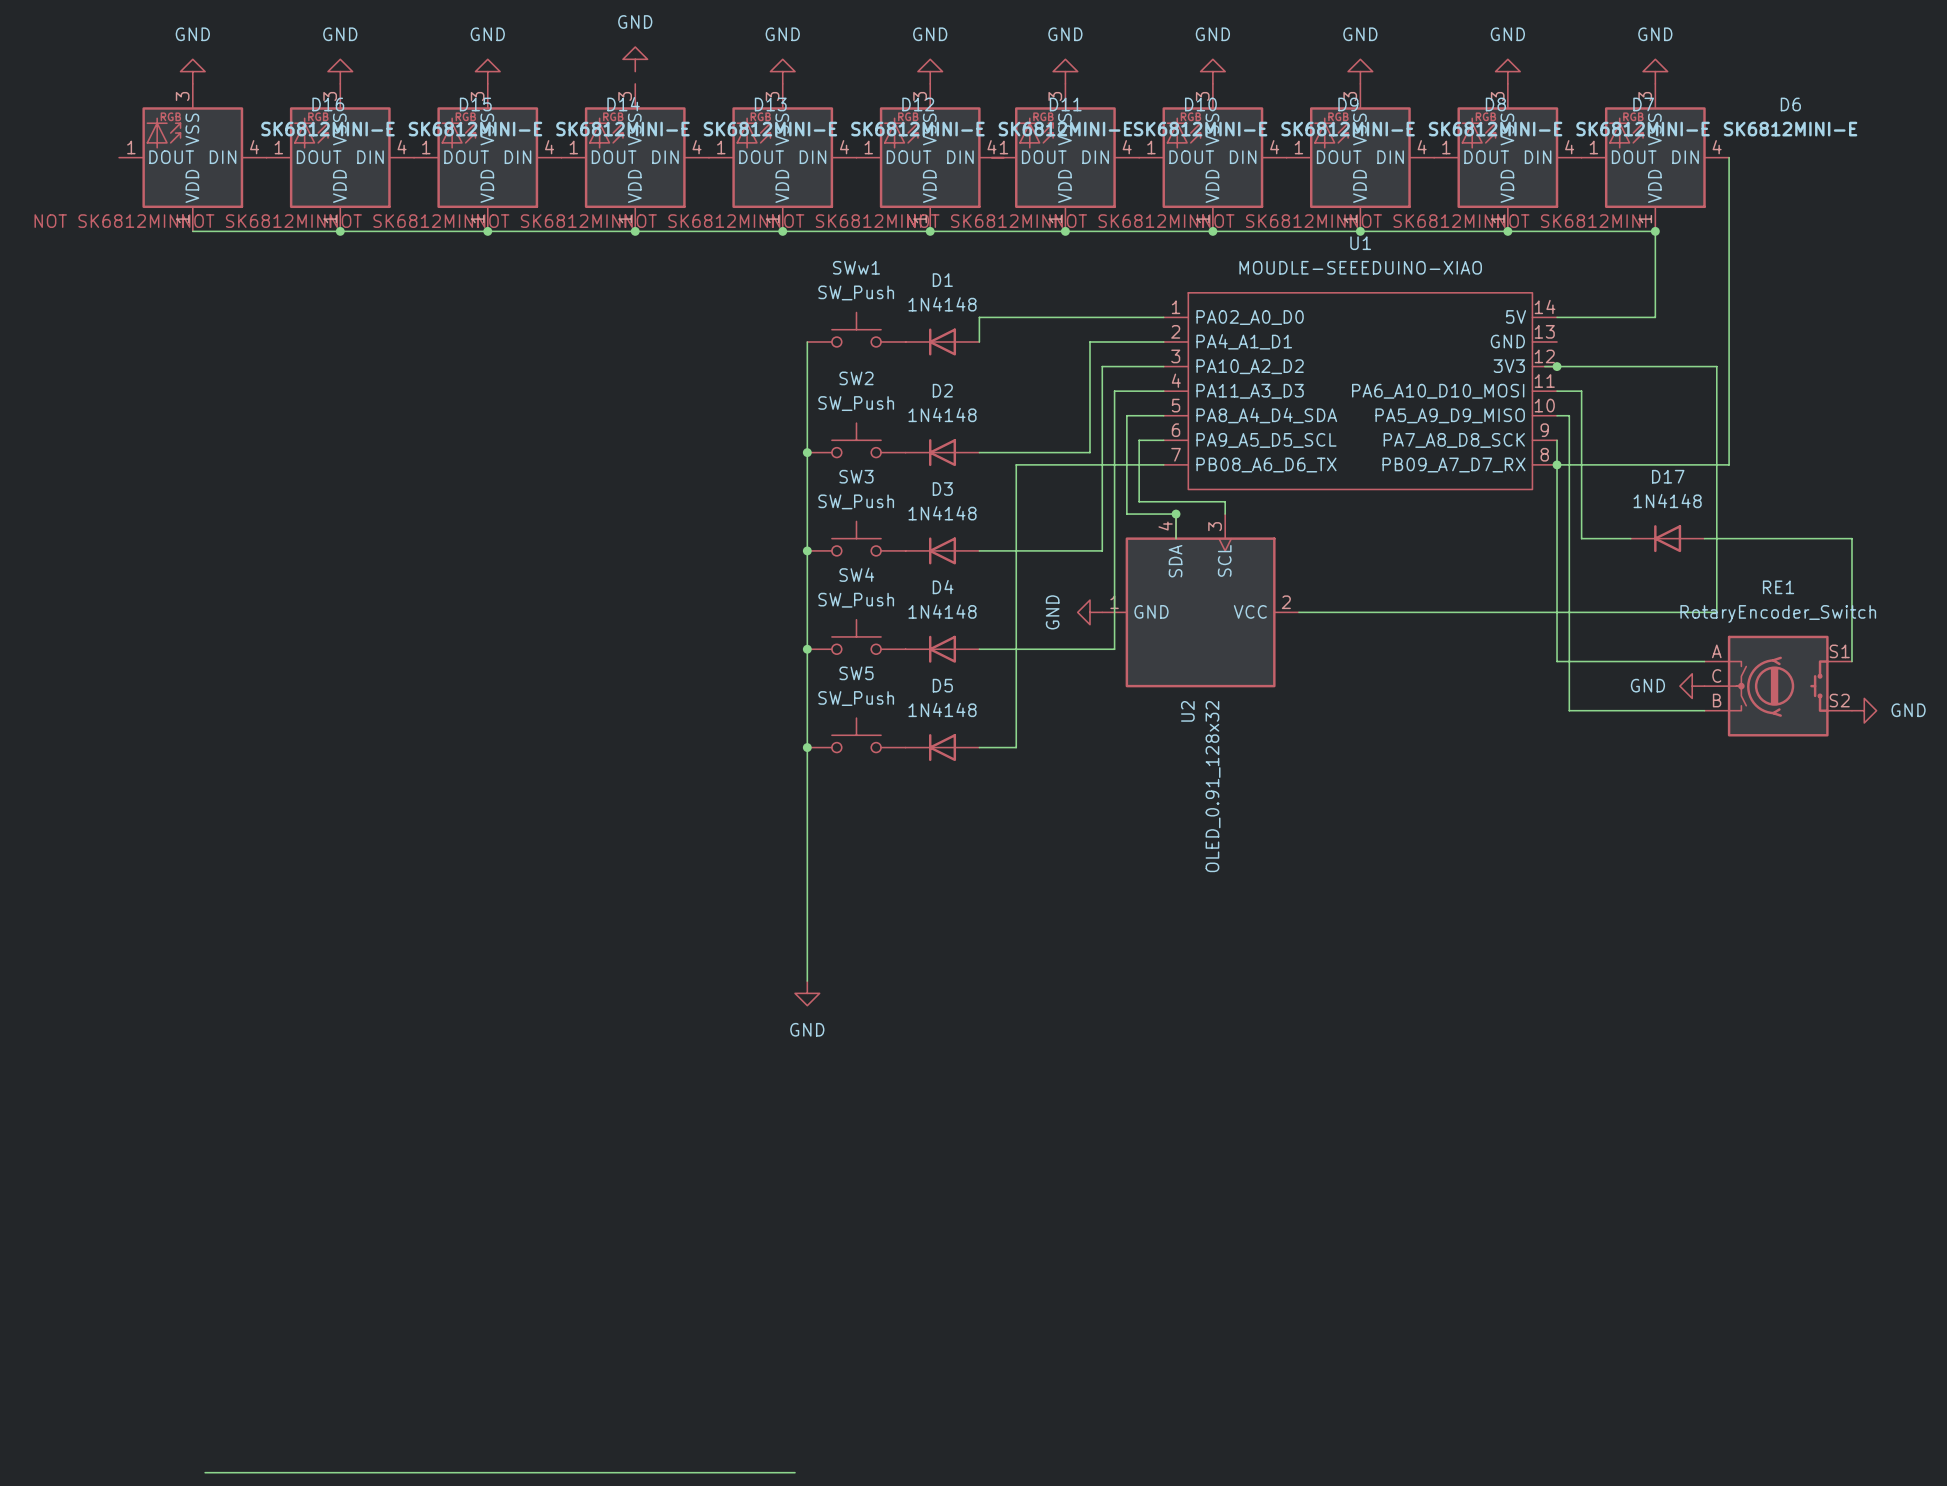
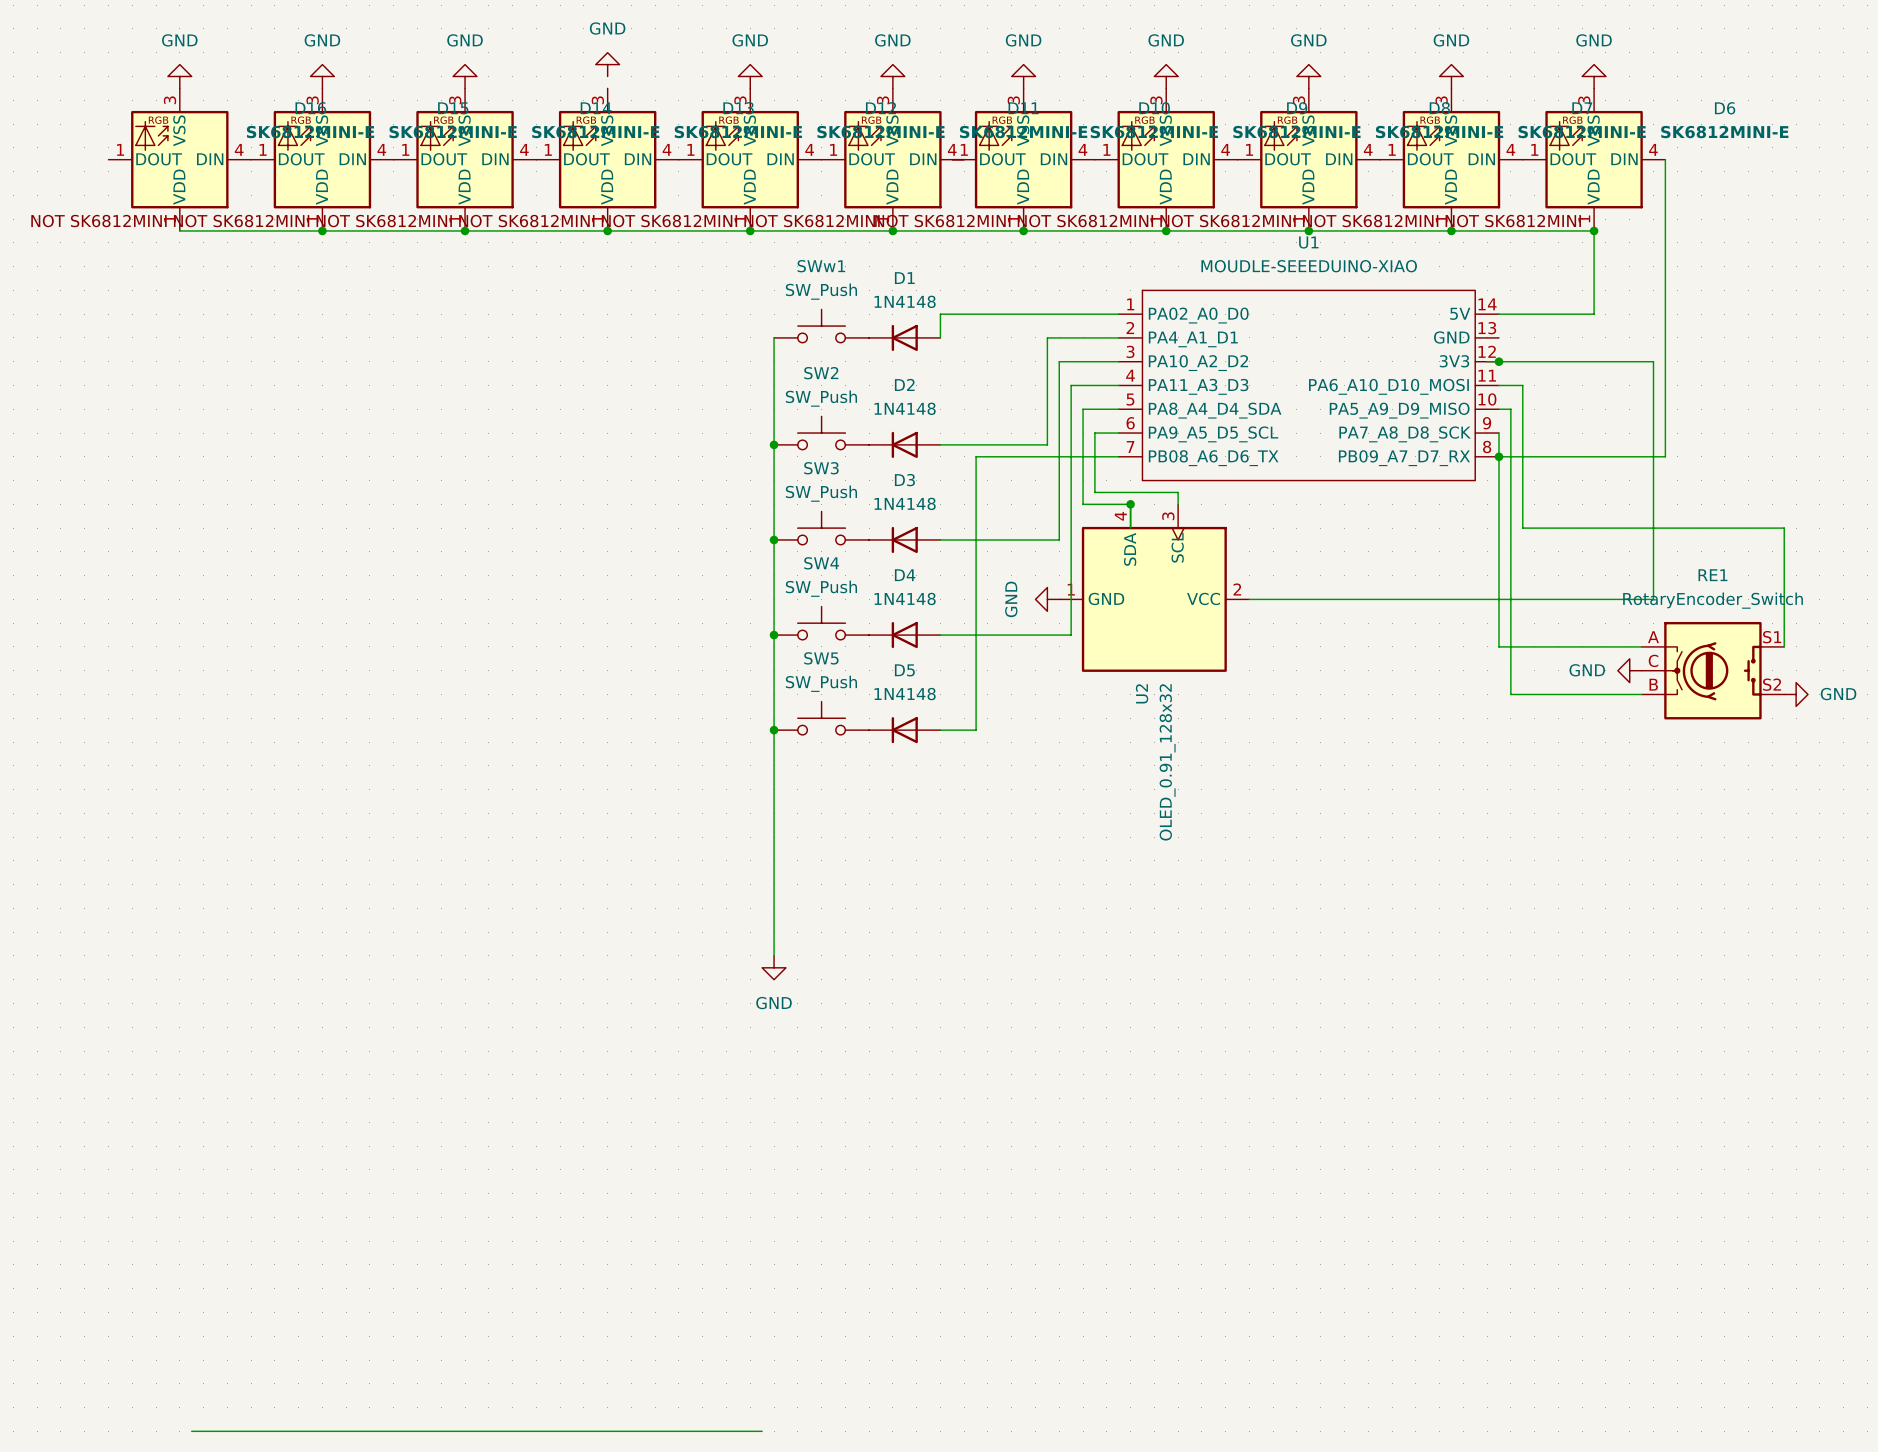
D17: 1N4148 (1667, 538) -> none

